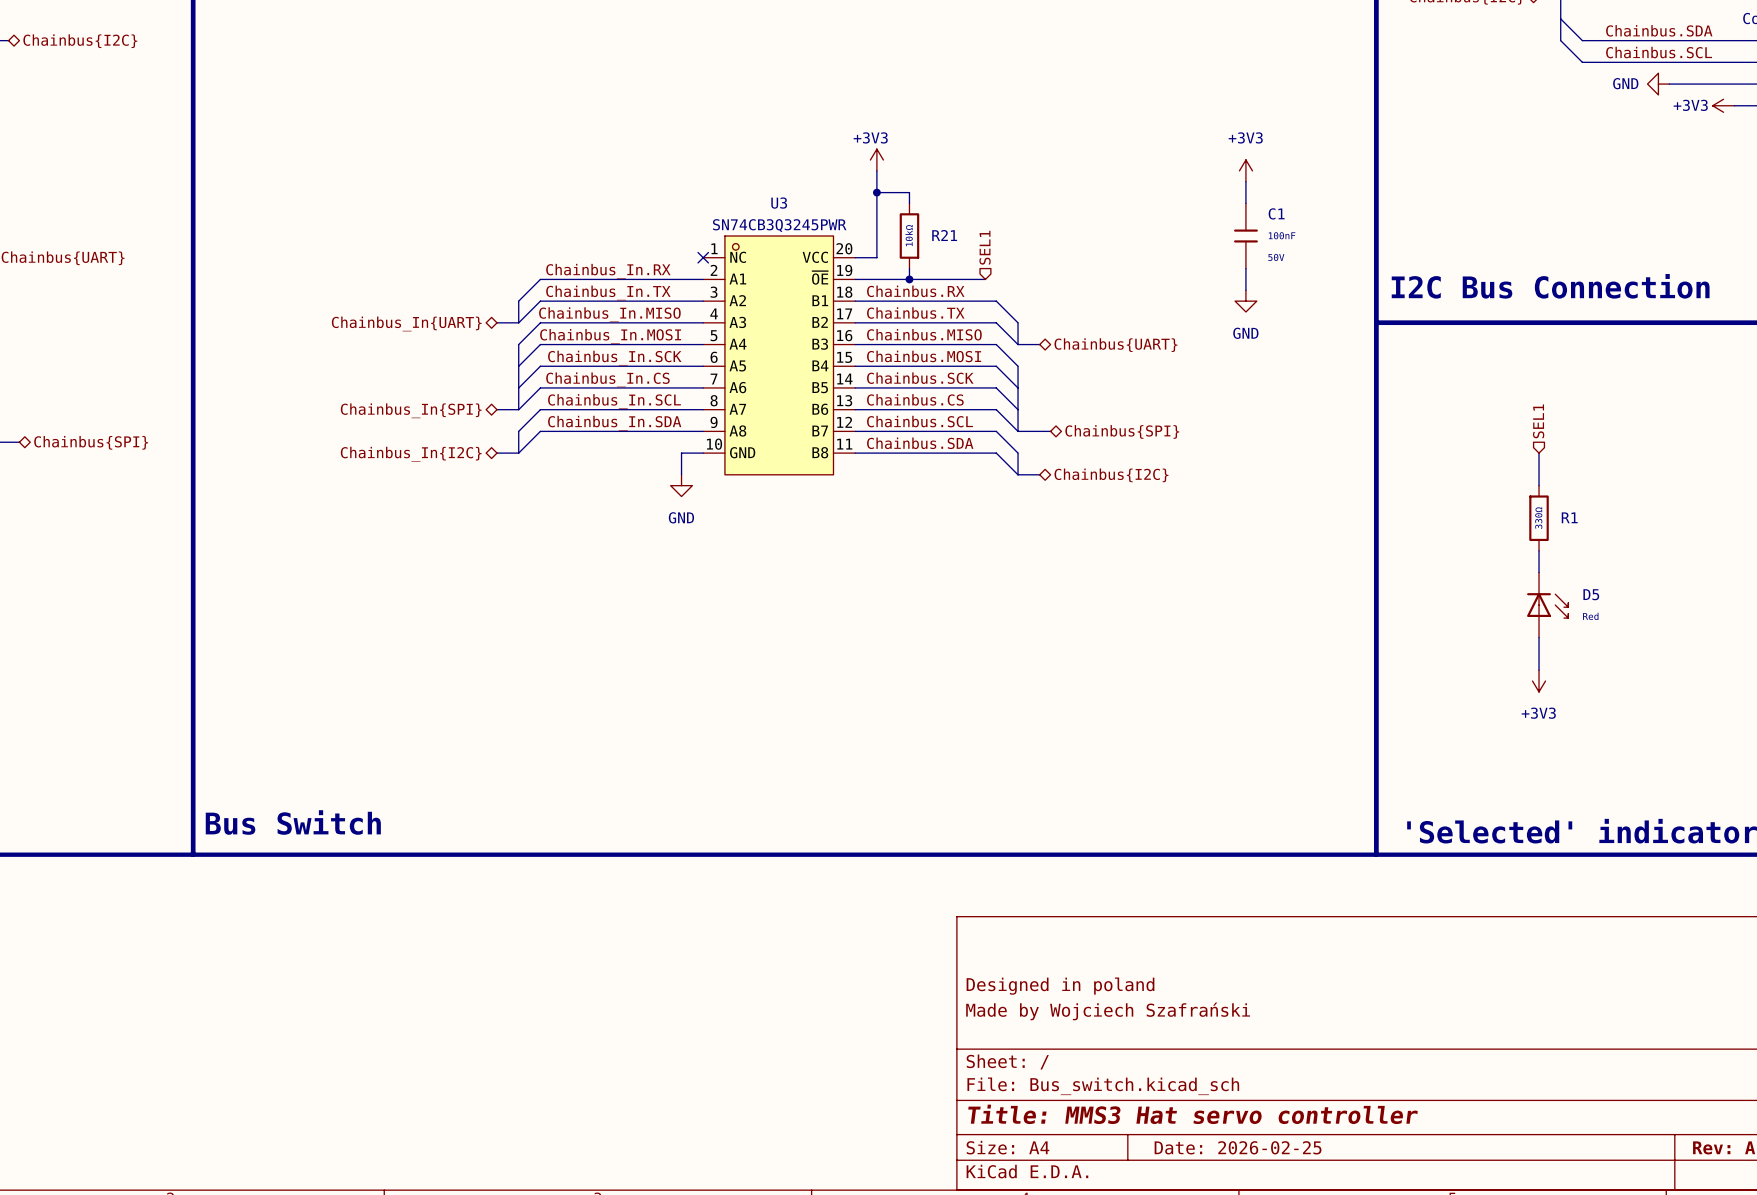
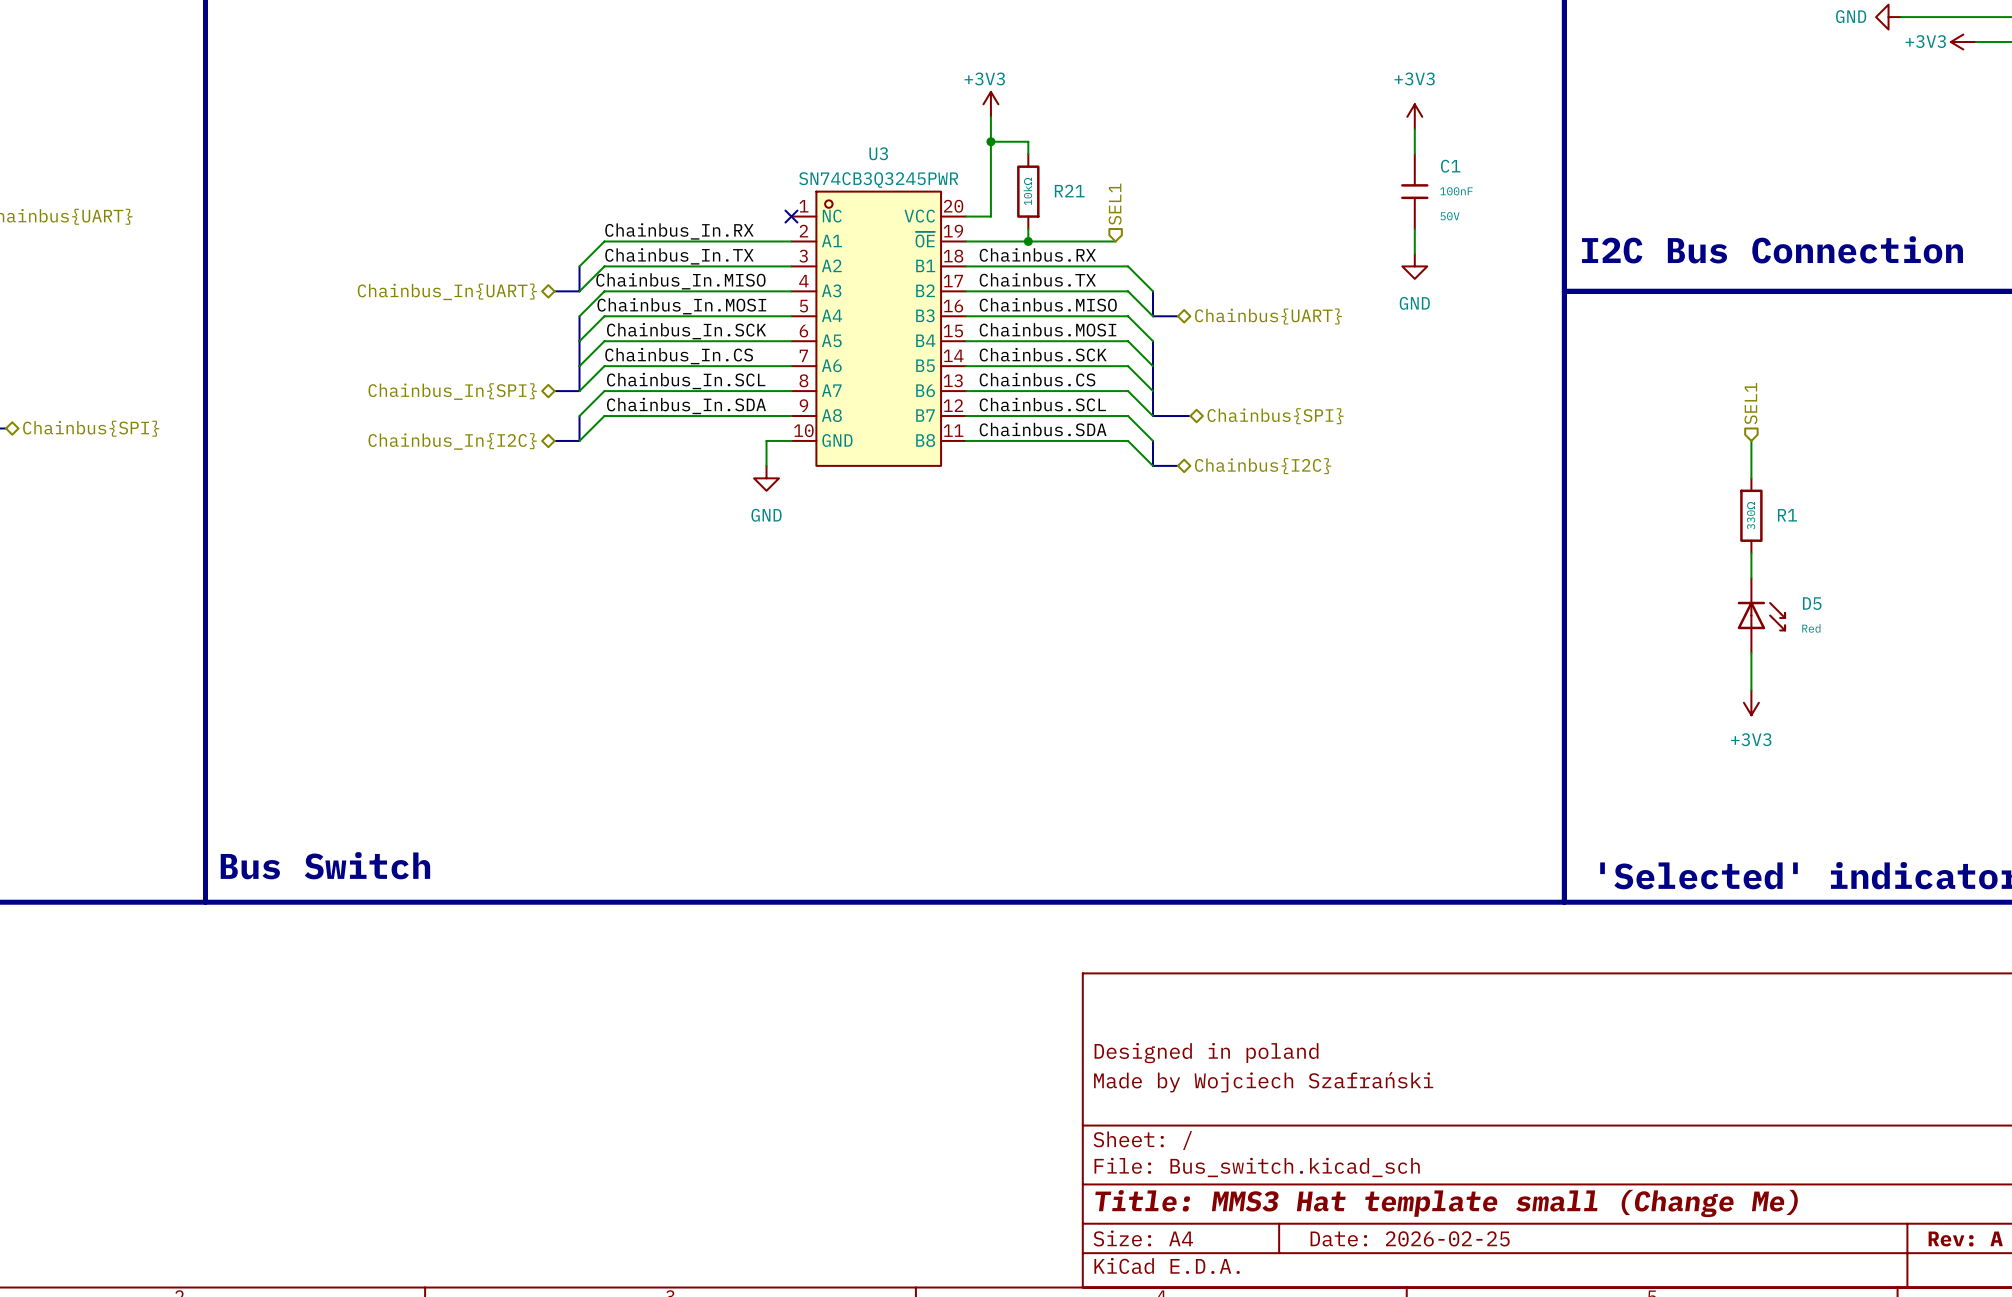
title block: Title: MMS3 Hat servo controller (1193, 1114) -> Title: MMS3 Hat template small (Change Me) (1446, 1203)

